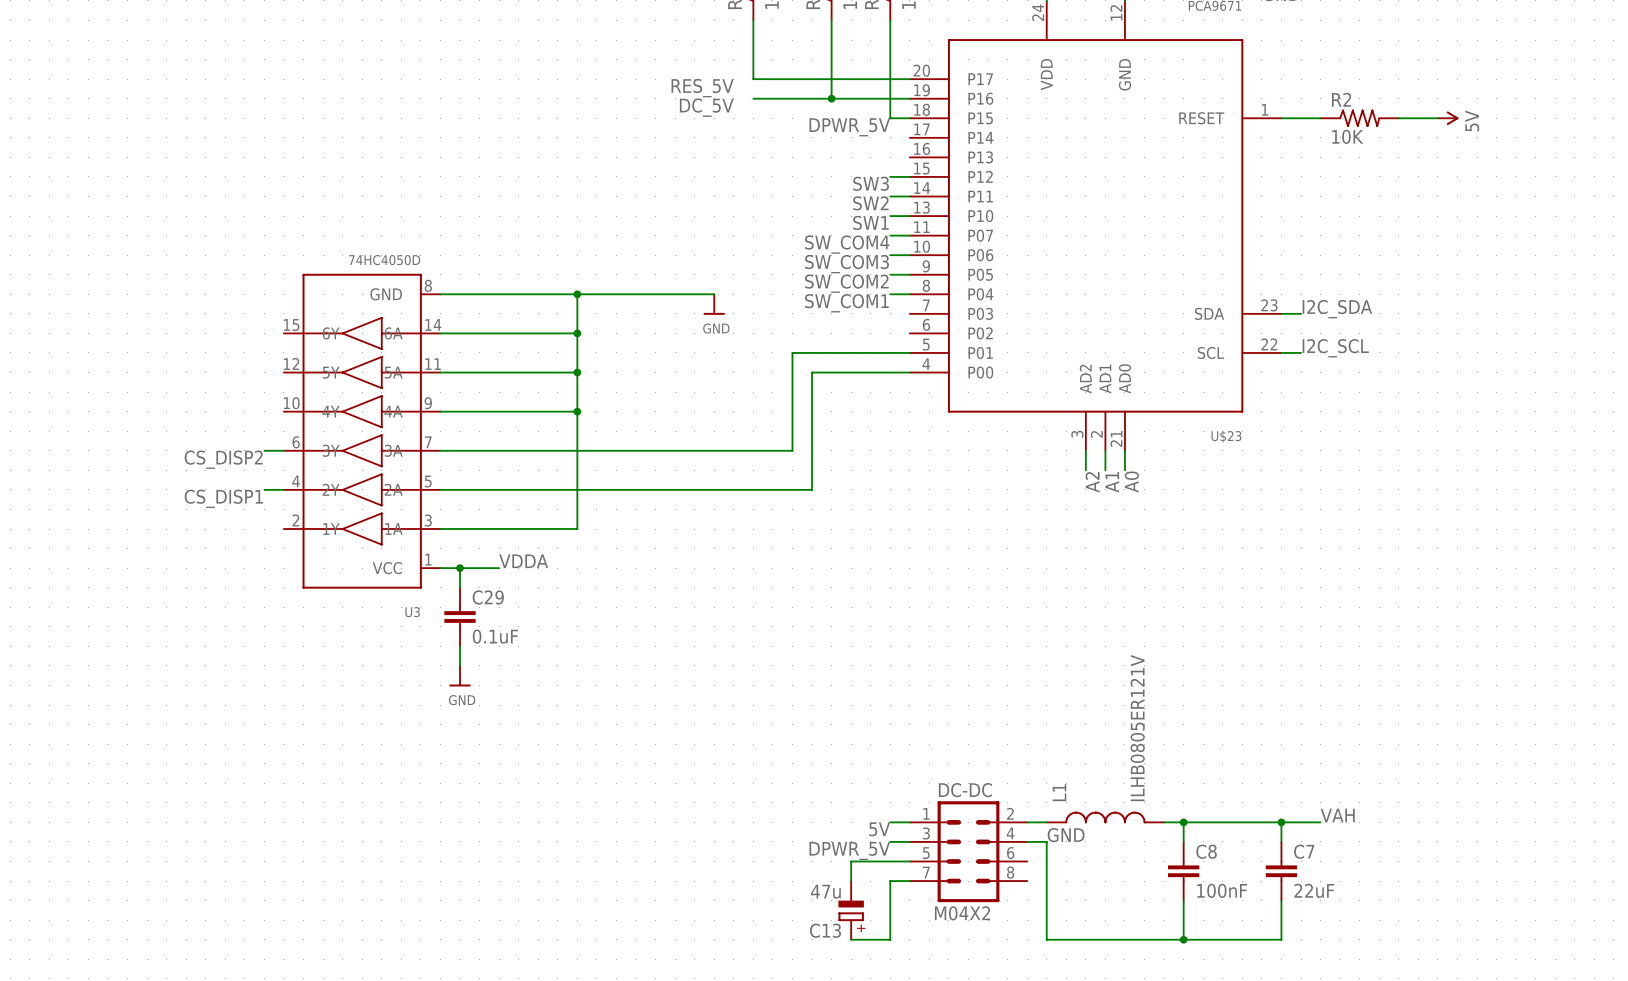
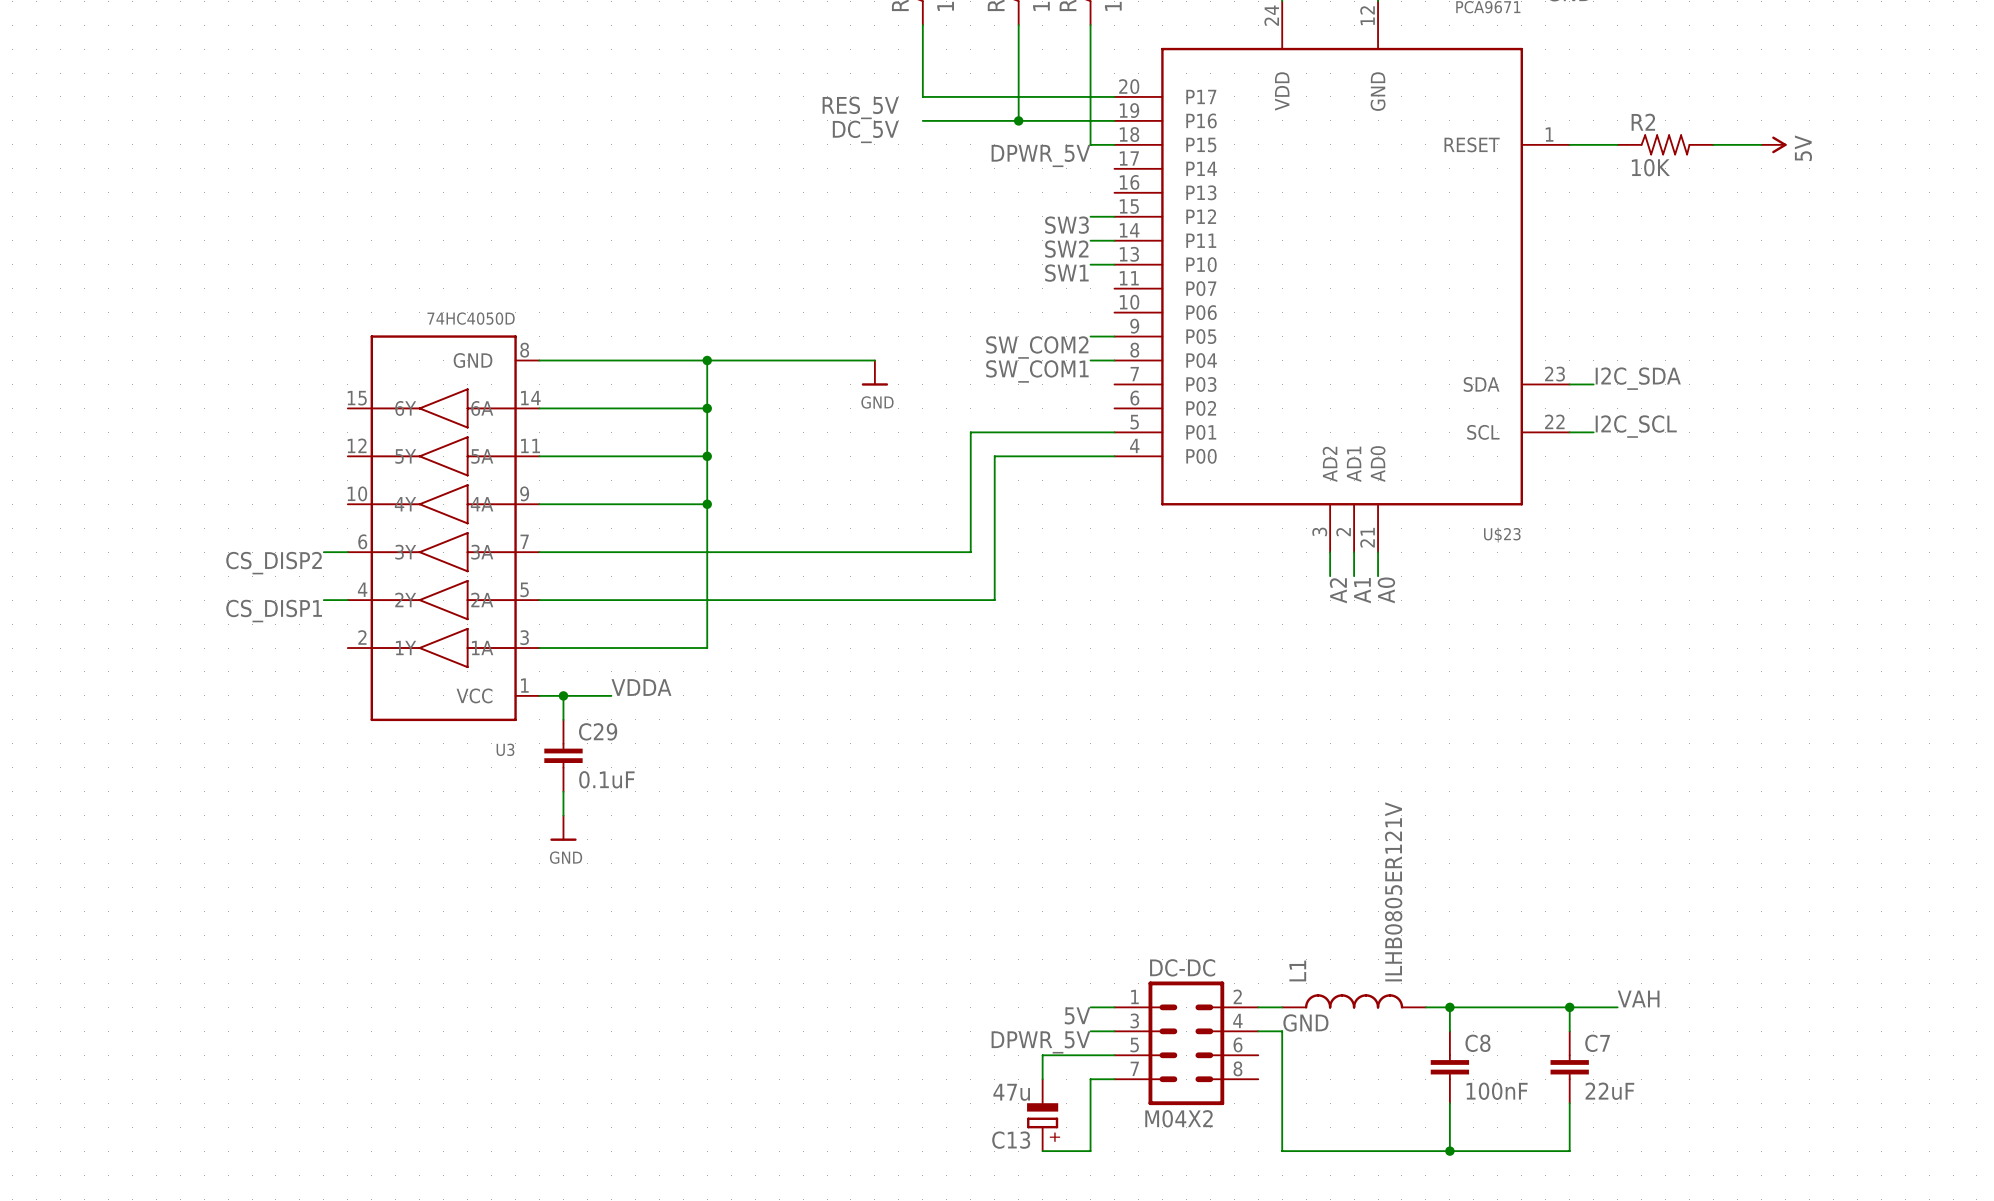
wire: (890, 235) (909, 235) -> none
label: SW_COM4 (847, 244) -> none
wire: (890, 255) (909, 255) -> none
label: SW_COM3 (846, 264) -> none

